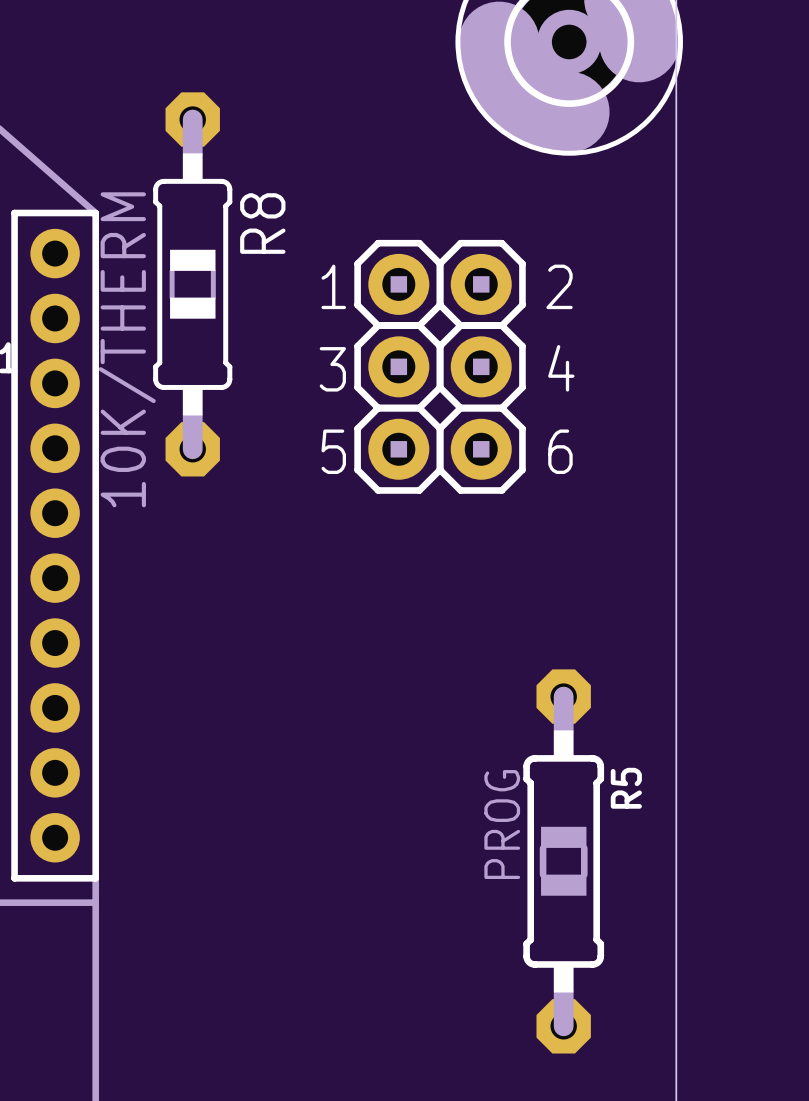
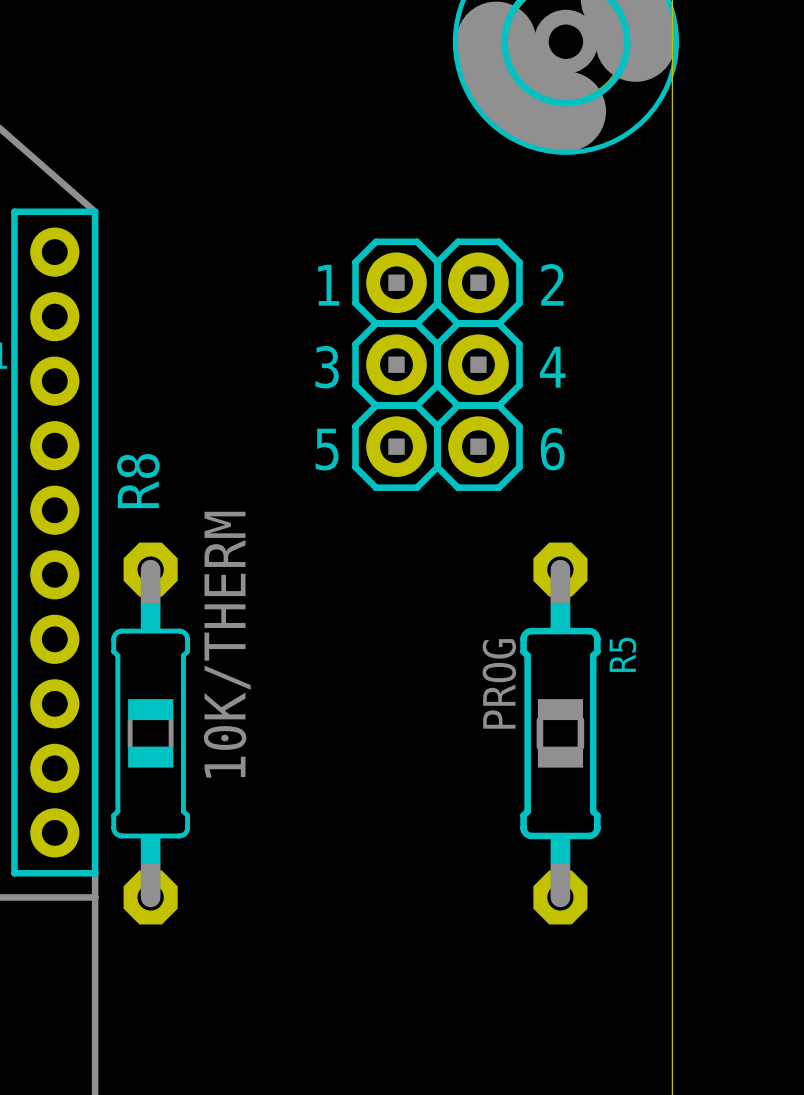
R8 name position: R8 (262, 223) -> R8 (138, 481)
R8 position: (192, 284) -> (150, 733)
R8 value position: 10K/THERM (127, 349) -> 10K/THERM (227, 644)
R5 position: (563, 861) -> (560, 733)

